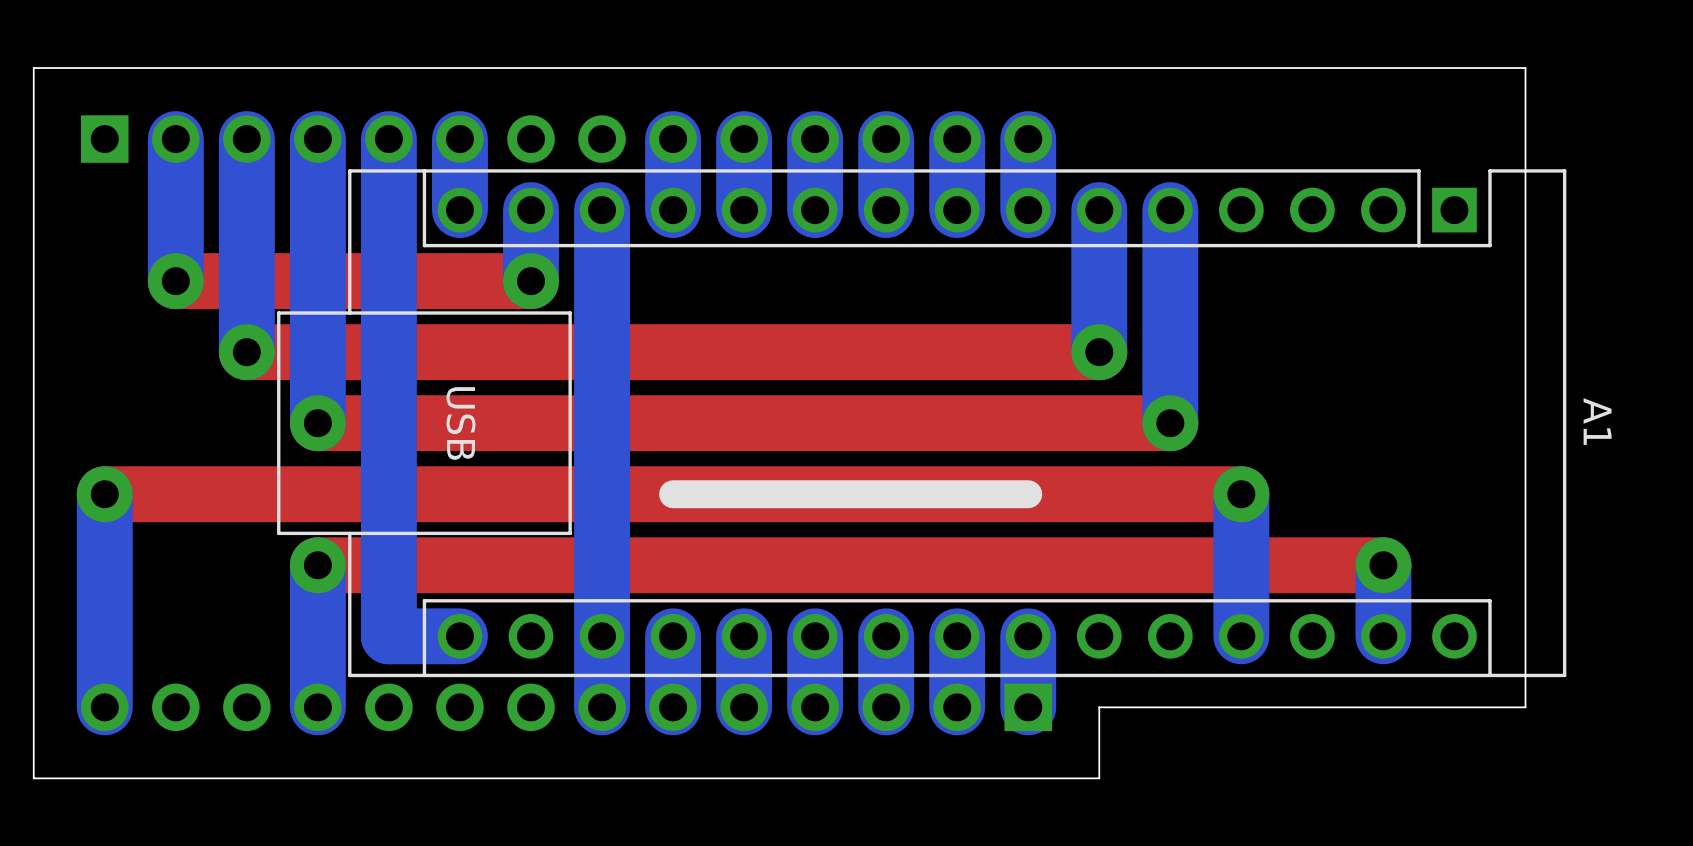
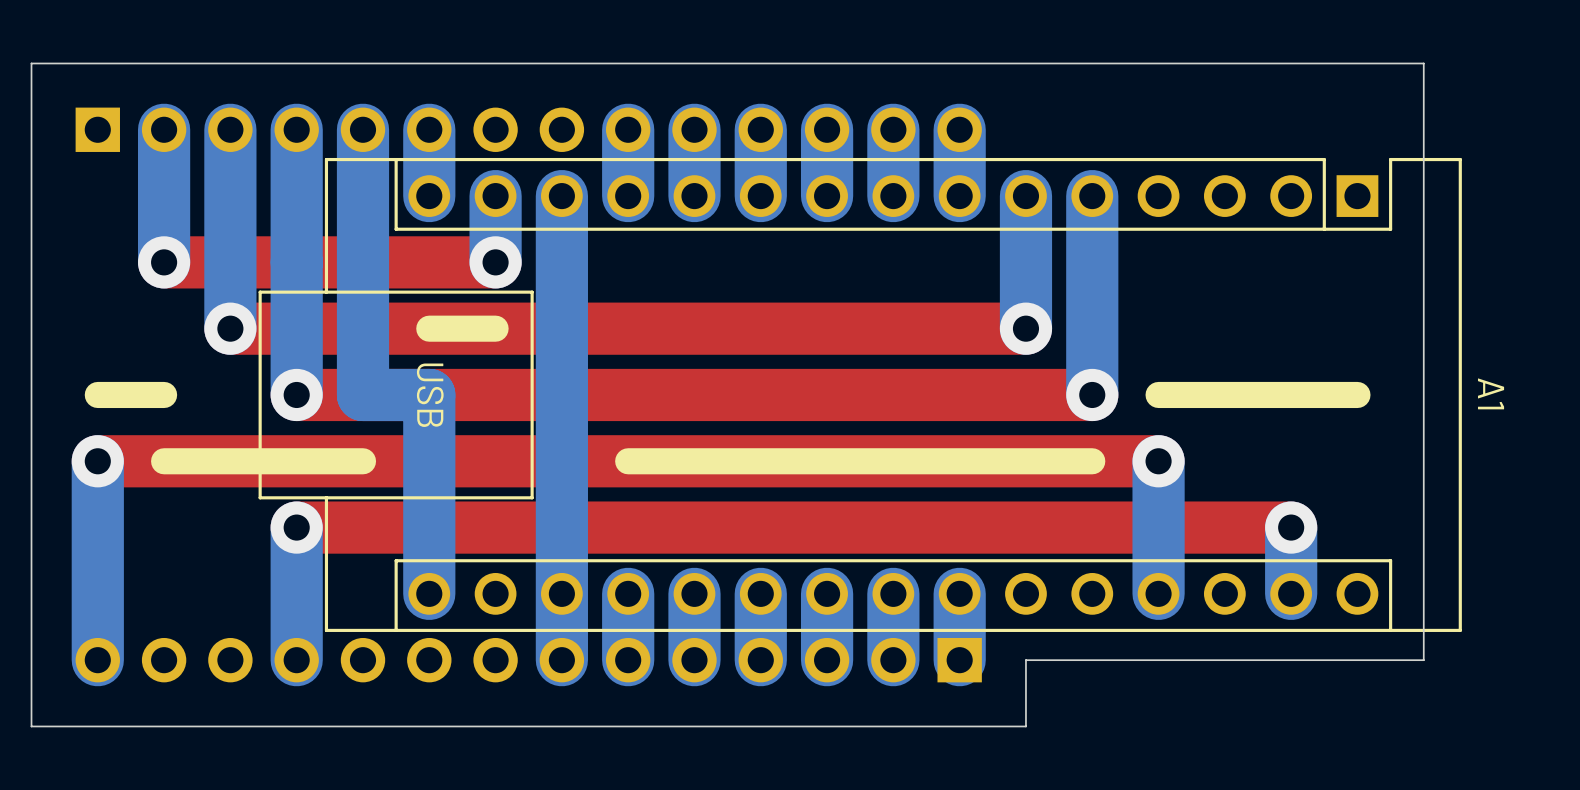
line: none -> (495, 328) (429, 328)
line: none -> (164, 394) (97, 394)
bottom track: (388, 423) (388, 636) (459, 636) -> (362, 394) (429, 394) (429, 593)
line: none -> (1357, 394) (1158, 394)
line: none -> (362, 461) (164, 461)
line: none -> (1092, 461) (959, 461)

